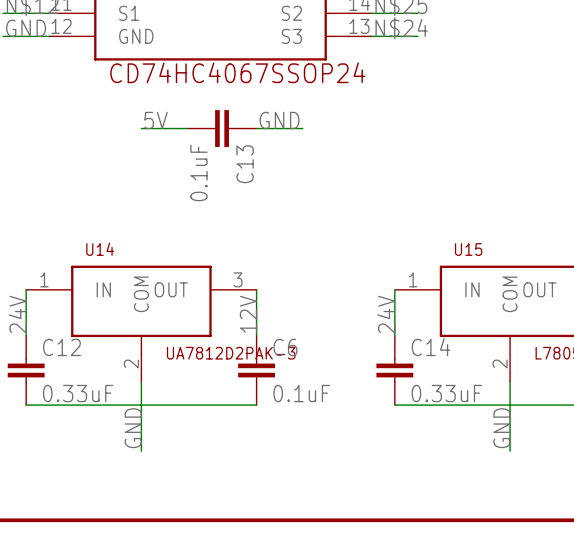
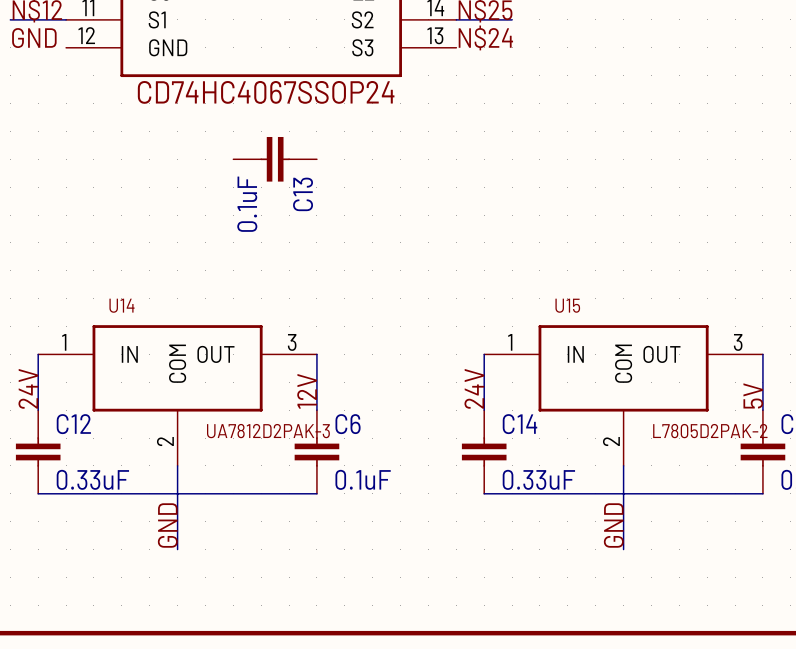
wire: (3, 36) (49, 36) -> none
wire: (371, 36) (417, 36) -> none
label: 5V (156, 120) -> none
label: GND (279, 120) -> none
wire: (141, 128) (187, 128) -> none
wire: (256, 128) (302, 128) -> none

